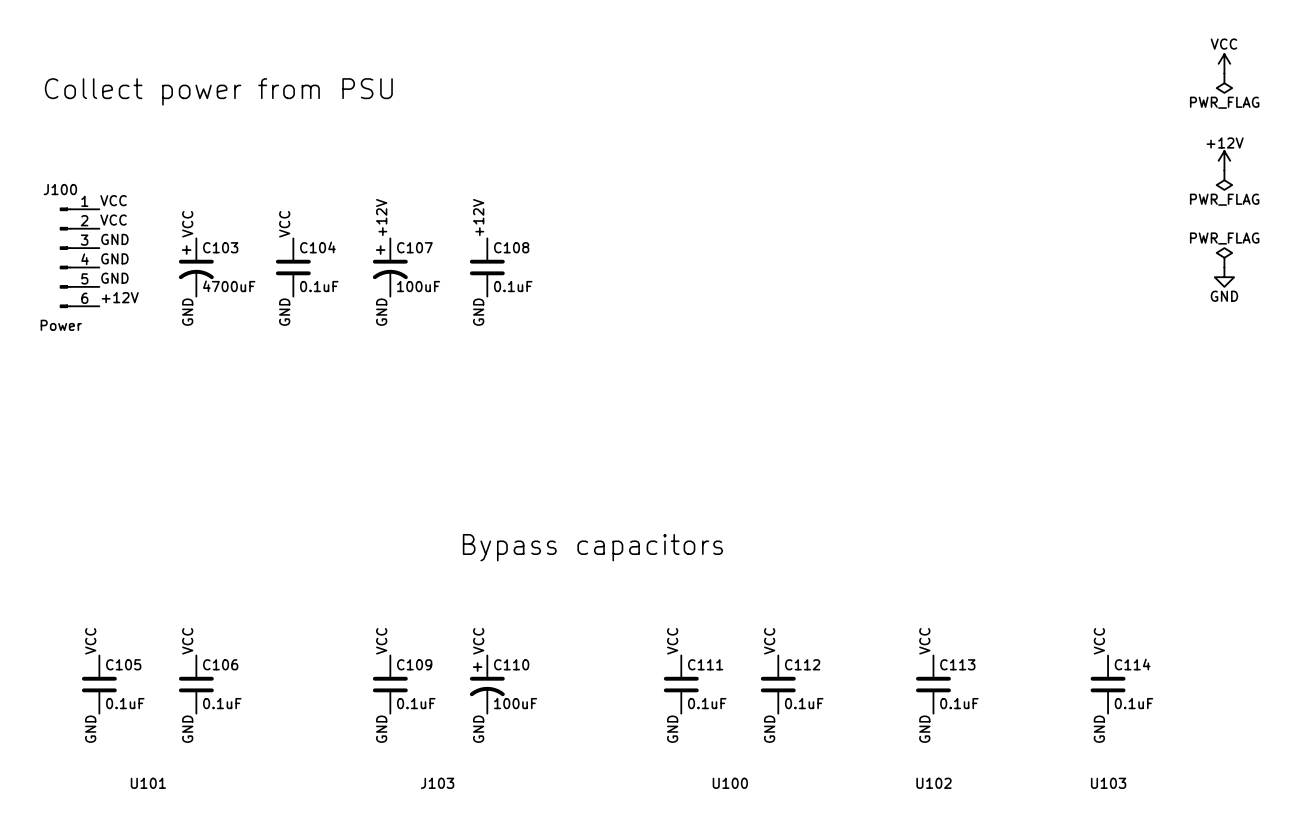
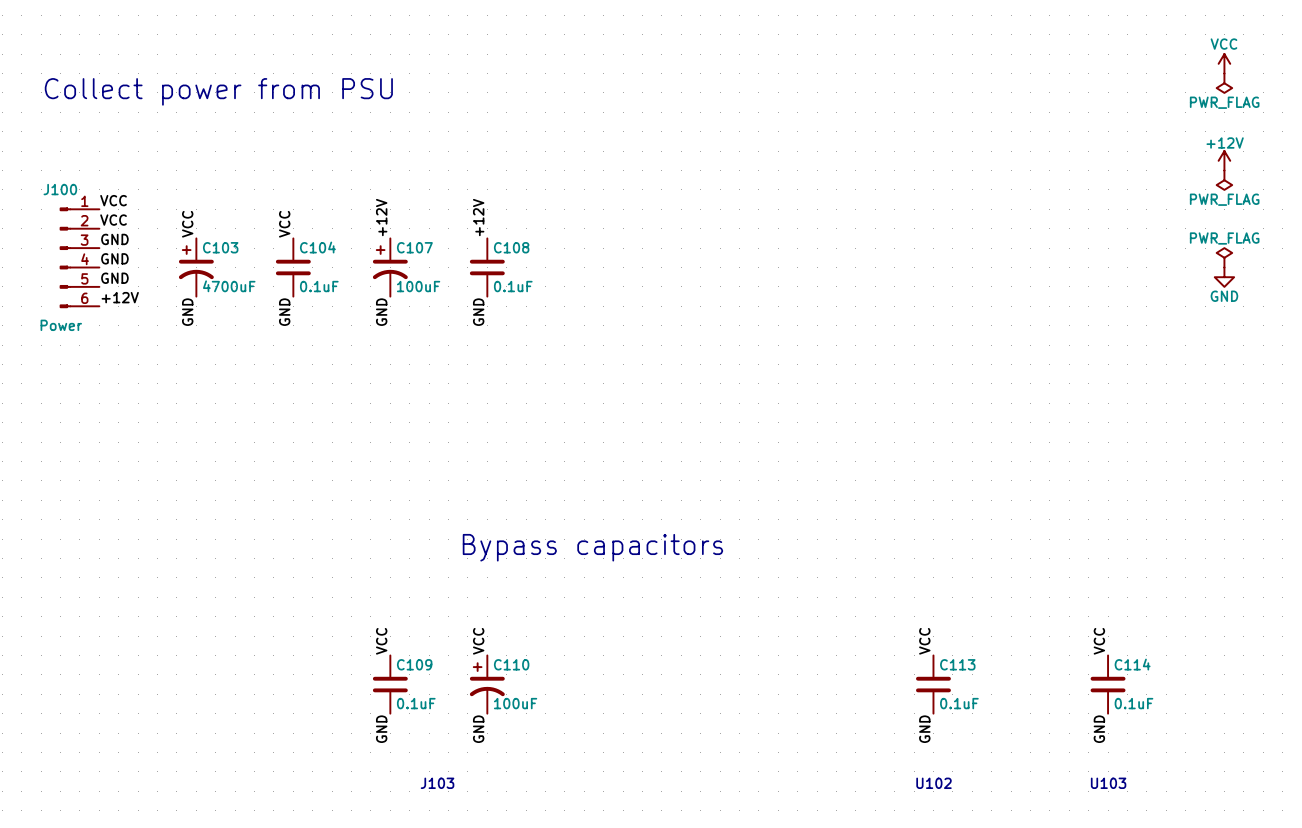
label: VCC (90, 641) -> none
label: VCC (187, 641) -> none
label: VCC (672, 641) -> none
label: VCC (769, 641) -> none
C105: 0.1uF (99, 684) -> none
C106: 0.1uF (196, 684) -> none
C111: 0.1uF (681, 684) -> none
C112: 0.1uF (778, 684) -> none
label: GND (90, 729) -> none
label: GND (187, 729) -> none
label: GND (672, 729) -> none
label: GND (769, 729) -> none
text: U101 (148, 783) -> none
text: U100 (730, 783) -> none

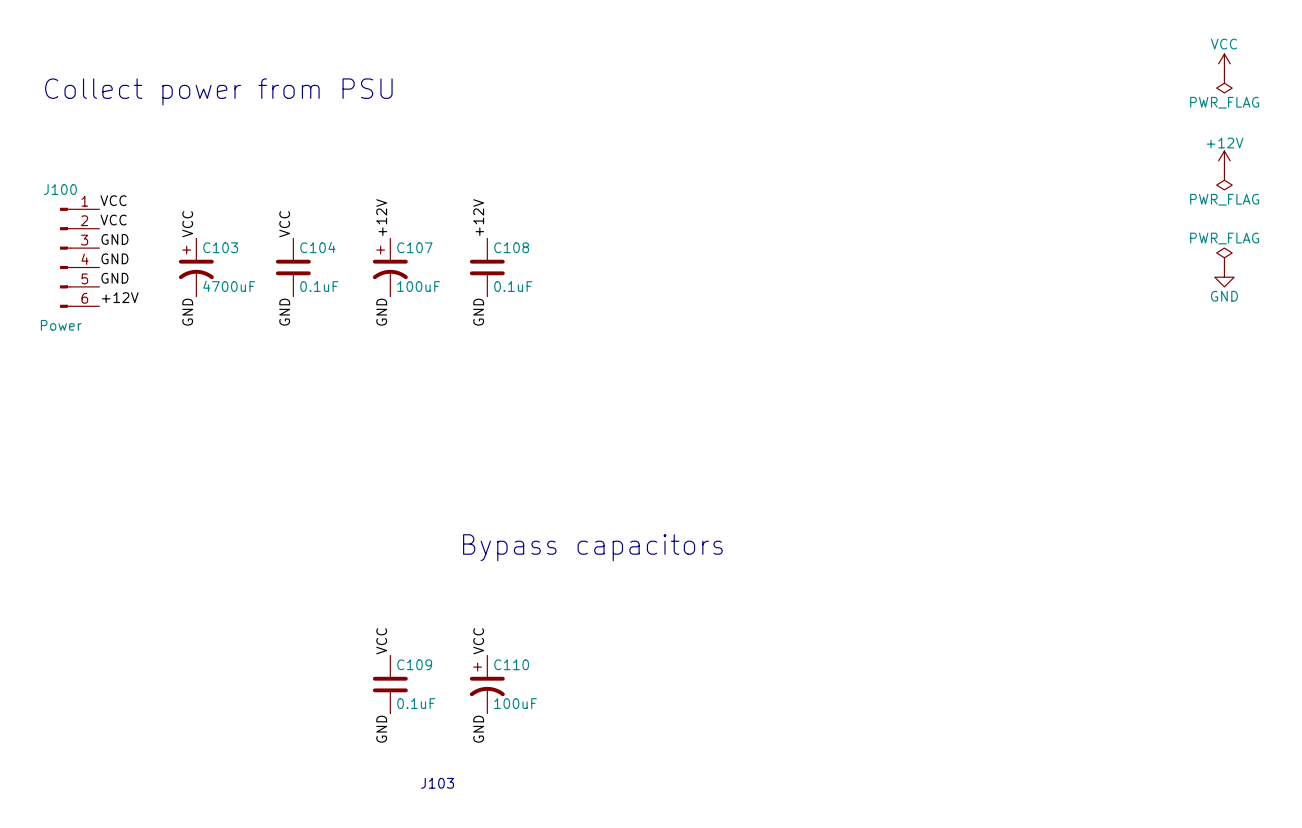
label: VCC (924, 641) -> none
label: VCC (1099, 641) -> none
C113: 0.1uF (933, 684) -> none
C114: 0.1uF (1108, 684) -> none
label: GND (924, 729) -> none
label: GND (1099, 729) -> none
text: U102 (934, 783) -> none
text: U103 (1108, 783) -> none

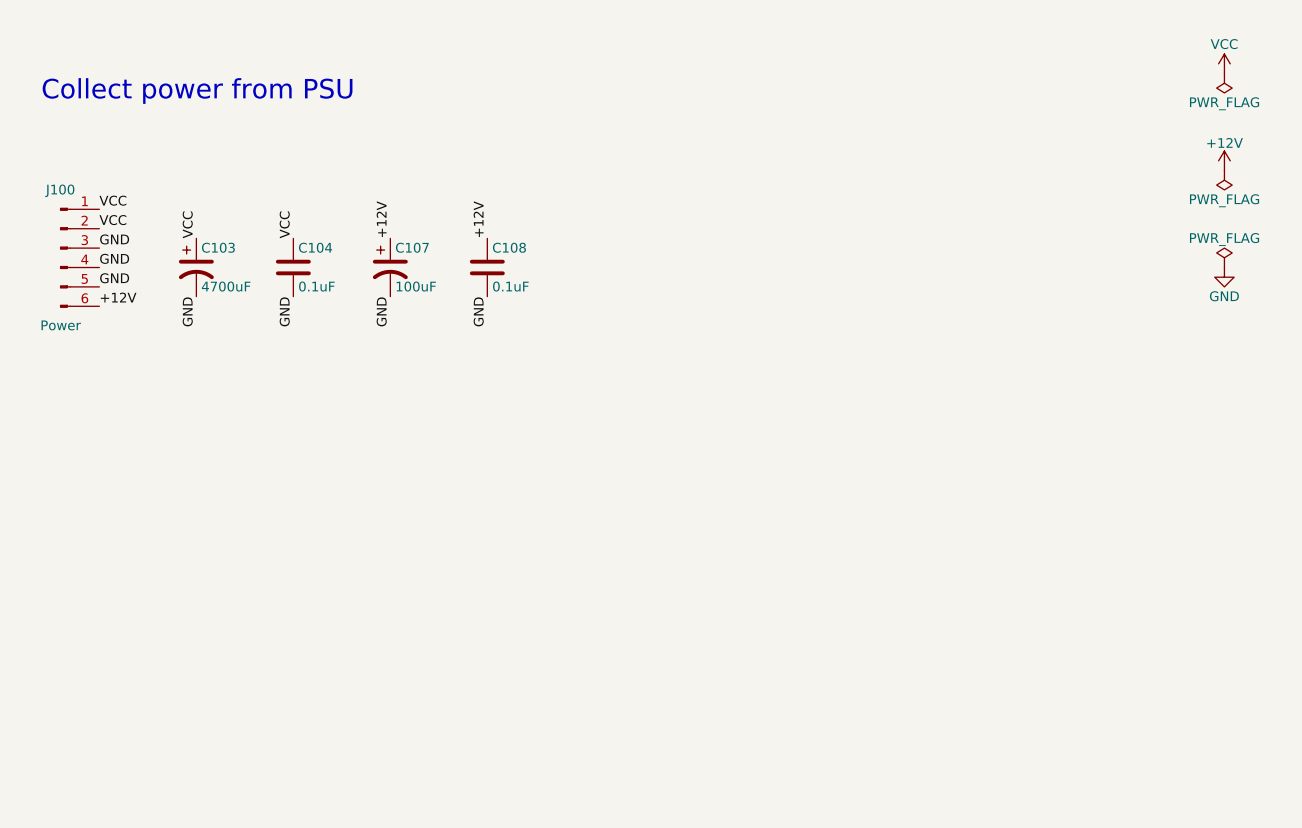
text: Bypass capacitors (592, 547) -> none
label: VCC (381, 641) -> none
label: VCC (478, 641) -> none
C109: 0.1uF (390, 684) -> none
C110: 100uF (487, 684) -> none
label: GND (381, 729) -> none
label: GND (478, 729) -> none
text: J103 (437, 783) -> none

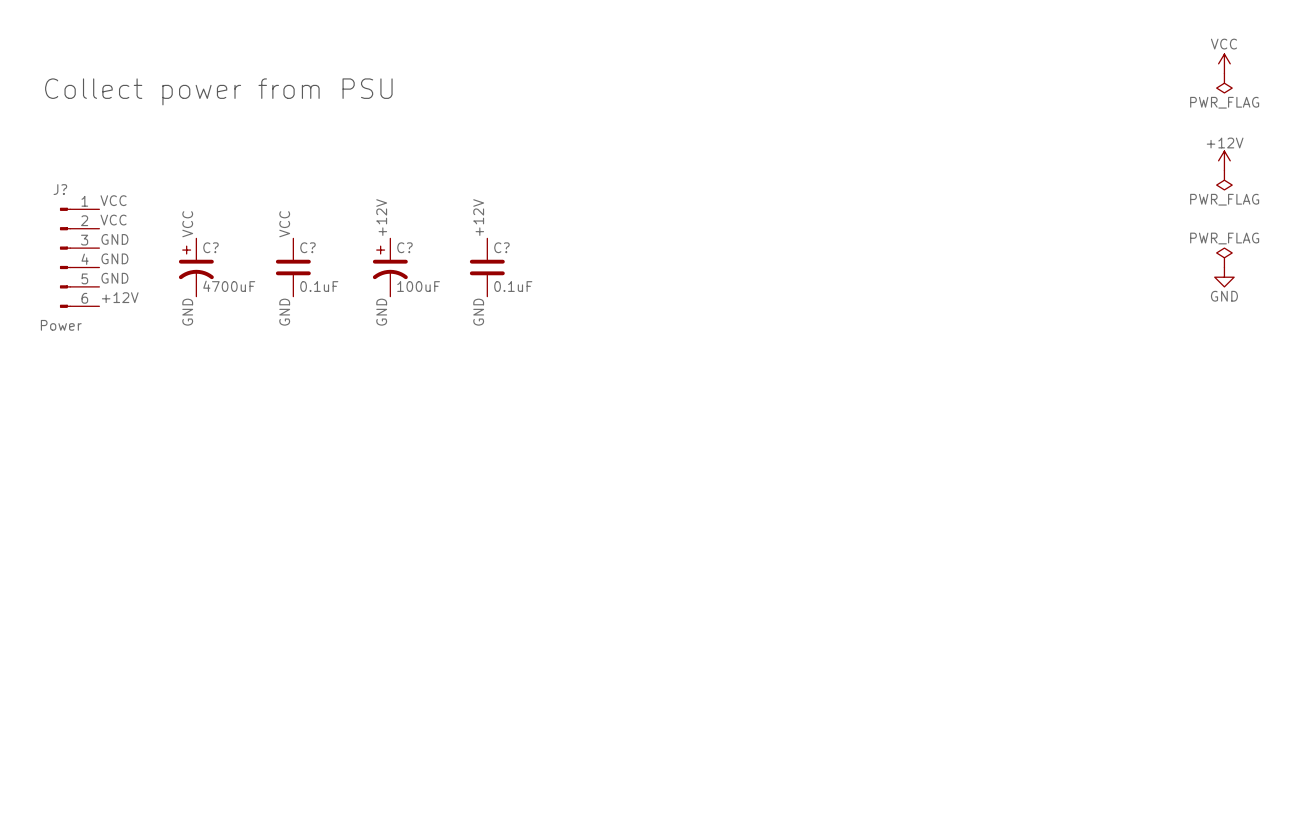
J100 name: J100 (59, 190) -> J? (60, 189)
C103 name: C103 (218, 247) -> C? (210, 247)
C104 name: C104 (315, 247) -> C? (307, 247)
C107 name: C107 (412, 247) -> C? (404, 247)
C108 name: C108 (509, 247) -> C? (501, 247)

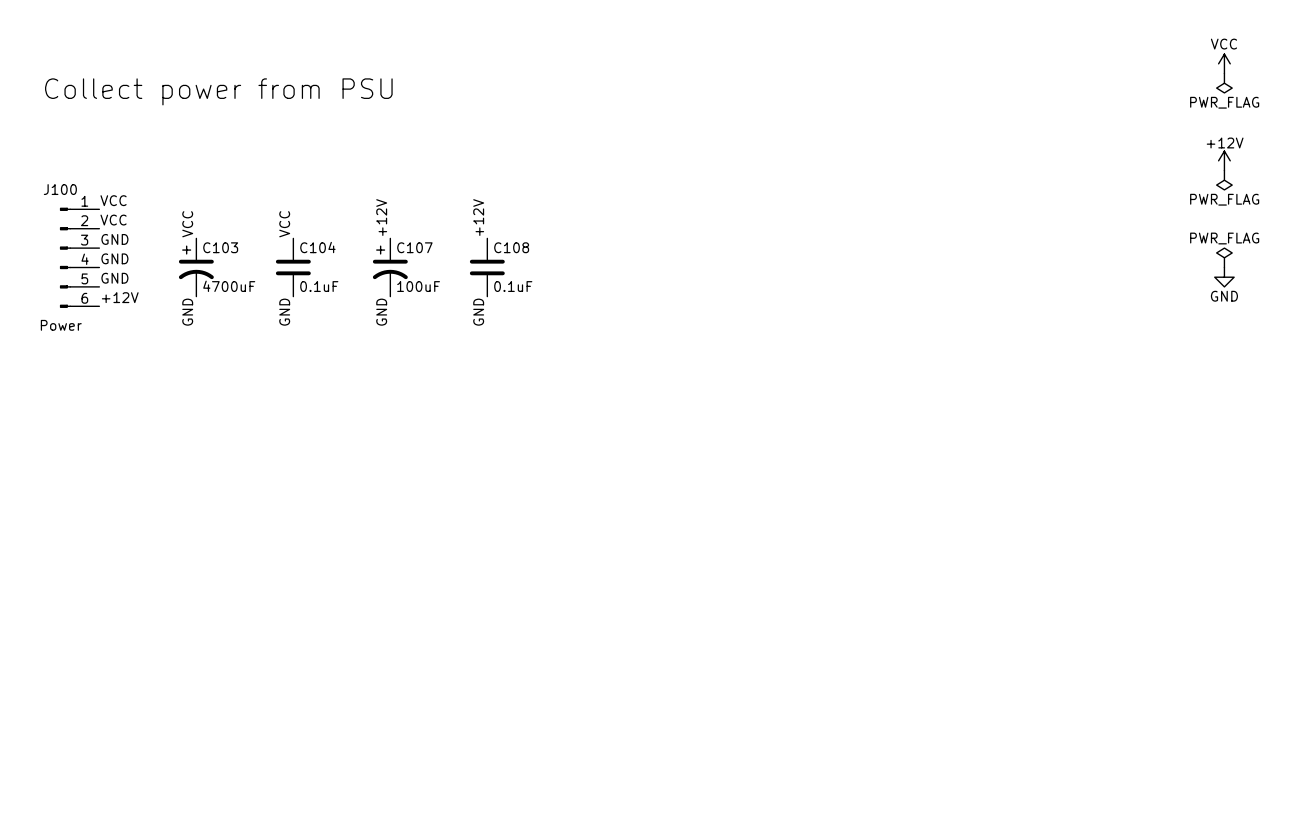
J? name: J? (60, 189) -> J100 (60, 189)
C? name: C? (210, 247) -> C103 (220, 247)
C? name: C? (307, 247) -> C104 (317, 247)
C? name: C? (404, 247) -> C107 (414, 247)
C? name: C? (501, 247) -> C108 (511, 247)

